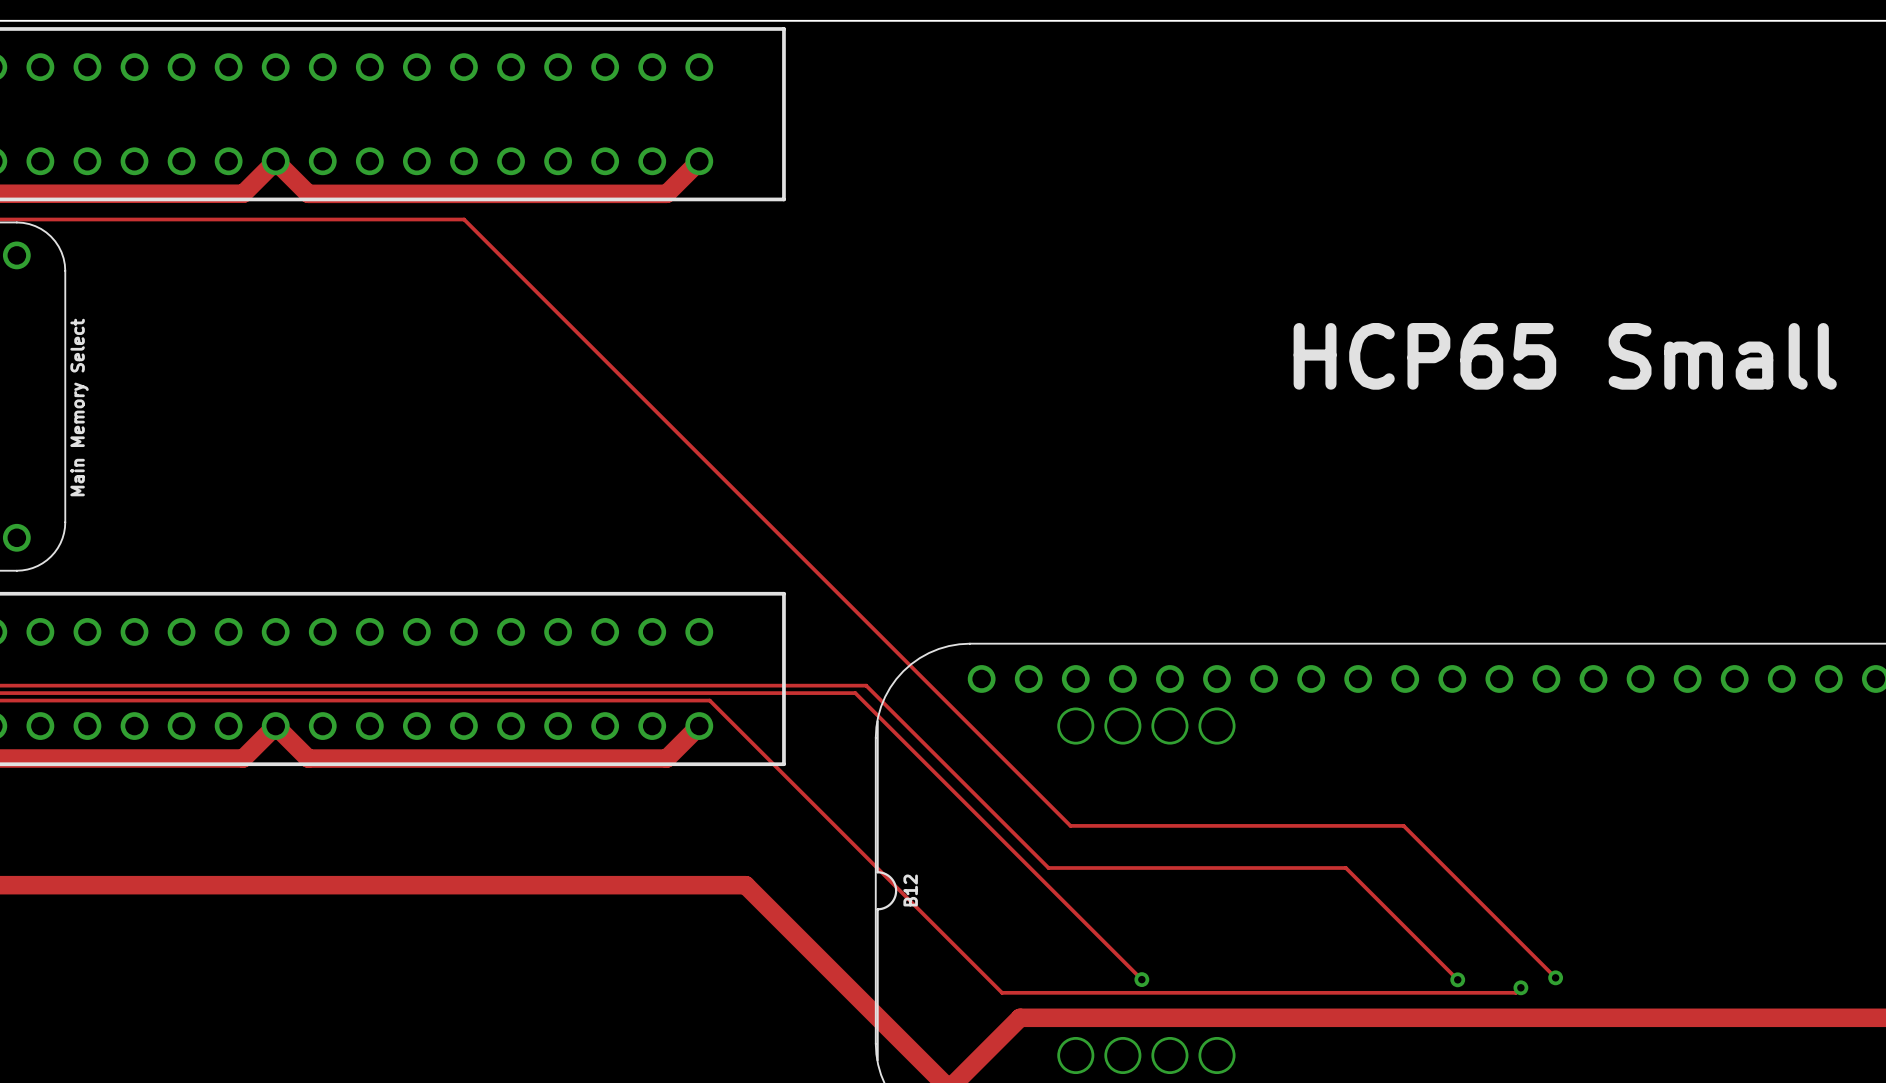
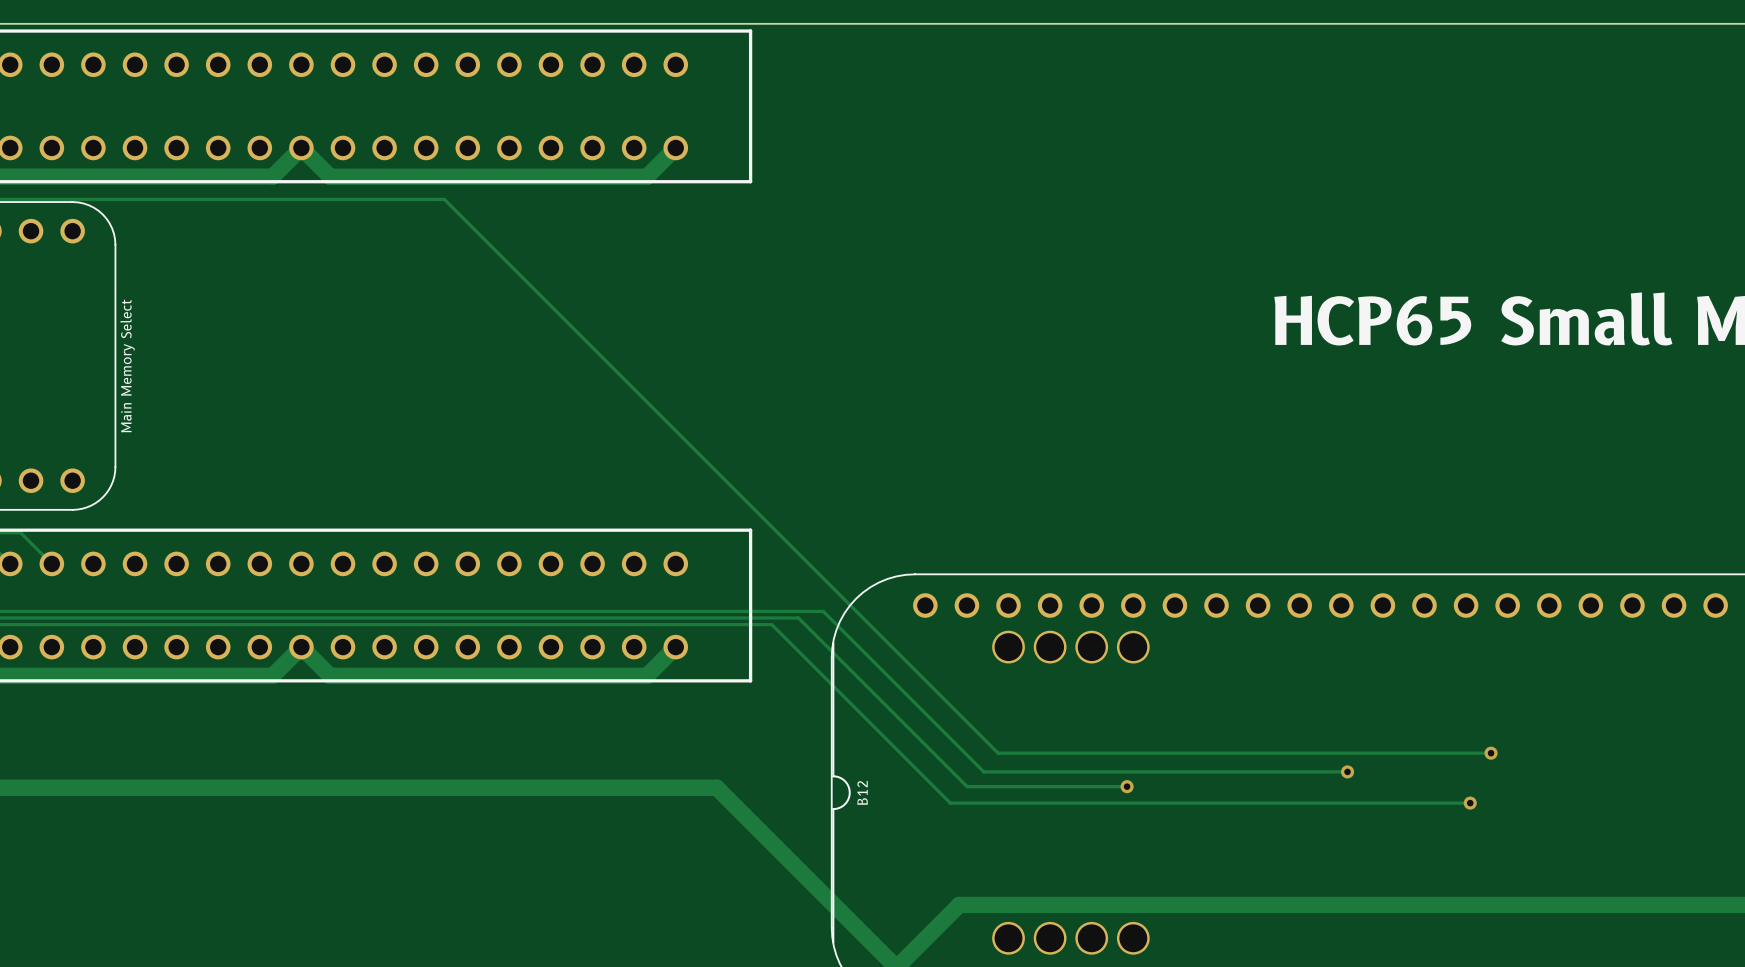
track: (437, 219) (464, 219) (1070, 825) (1403, 825) (1555, 977) -> (444, 199) (998, 753) (1491, 753)
track: (838, 693) (855, 693) (1141, 979) -> (798, 617) (967, 786) (1127, 786)
track: (709, 700) (1002, 992) (1515, 992) (1520, 987) -> (685, 624) (771, 624) (950, 803) (1470, 803)
via: none -> (1491, 753)
track: (1047, 867) (1345, 868) (1457, 979) -> (983, 771) (1347, 771)
via: none -> (1347, 771)
via: none -> (1127, 786)
via: none -> (1470, 803)
via: (1555, 977) -> none
via: (1141, 979) -> none
via: (1457, 979) -> none
via: (1520, 987) -> none

